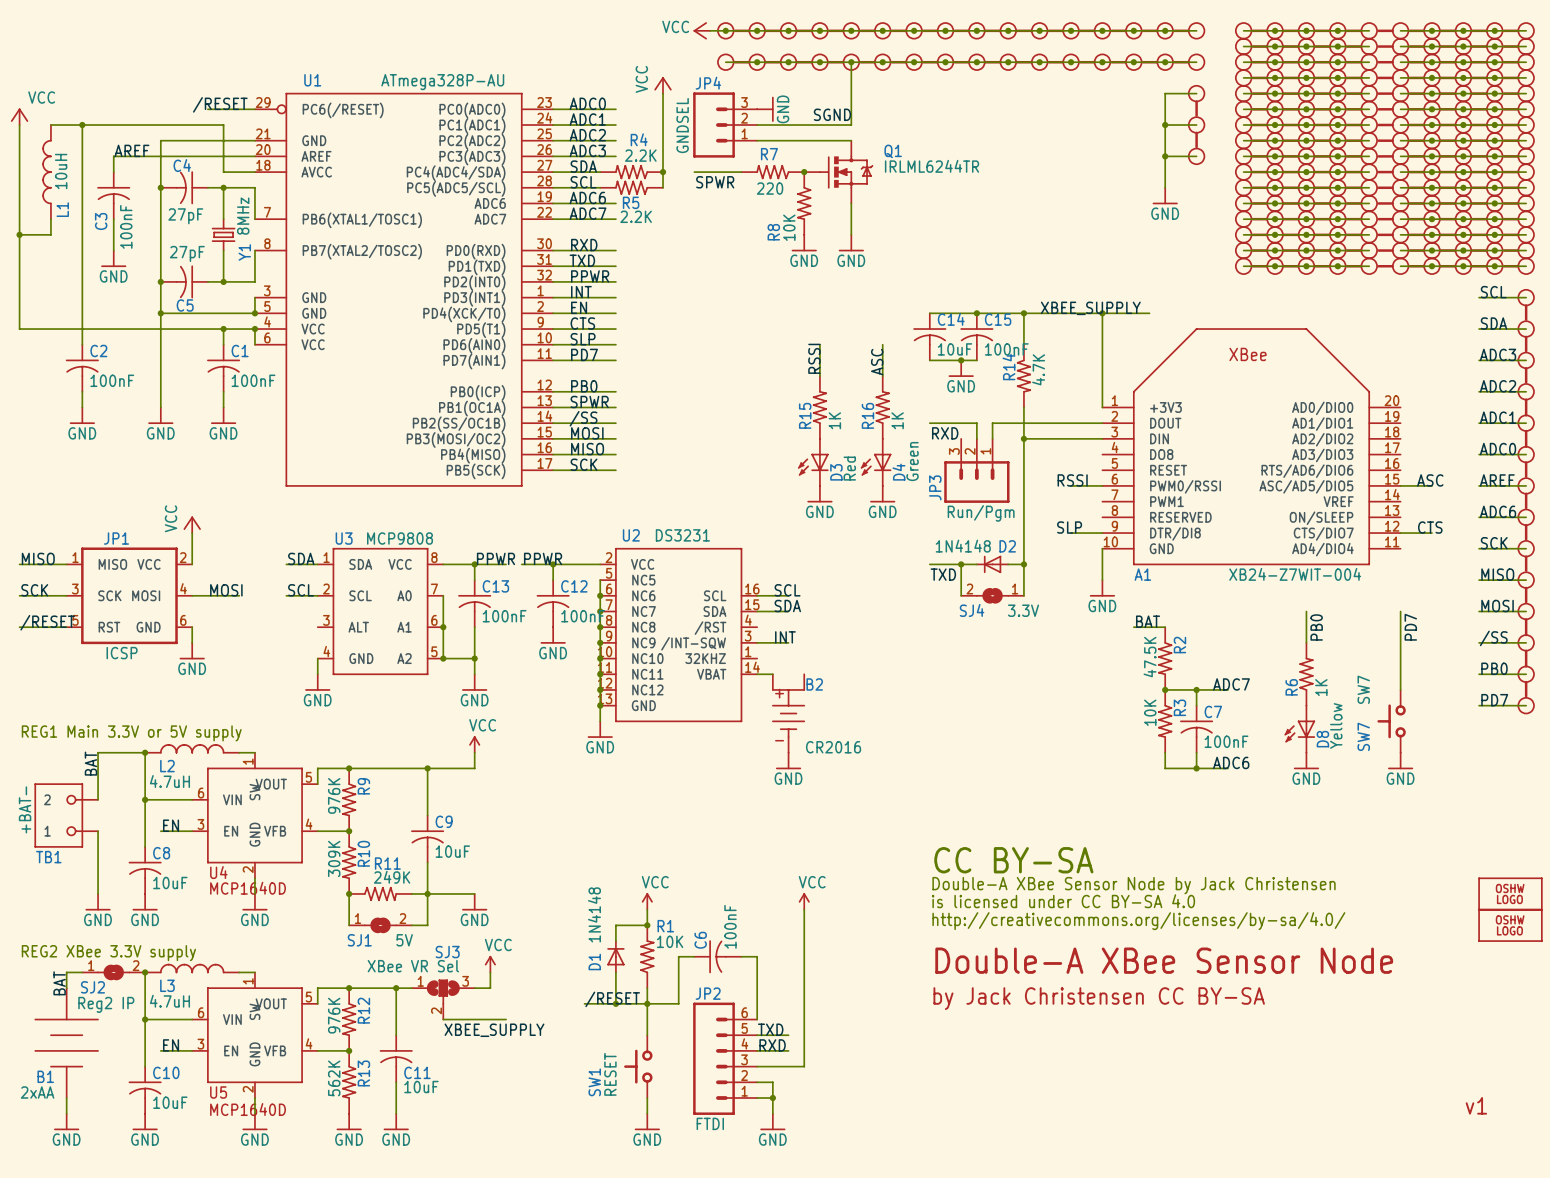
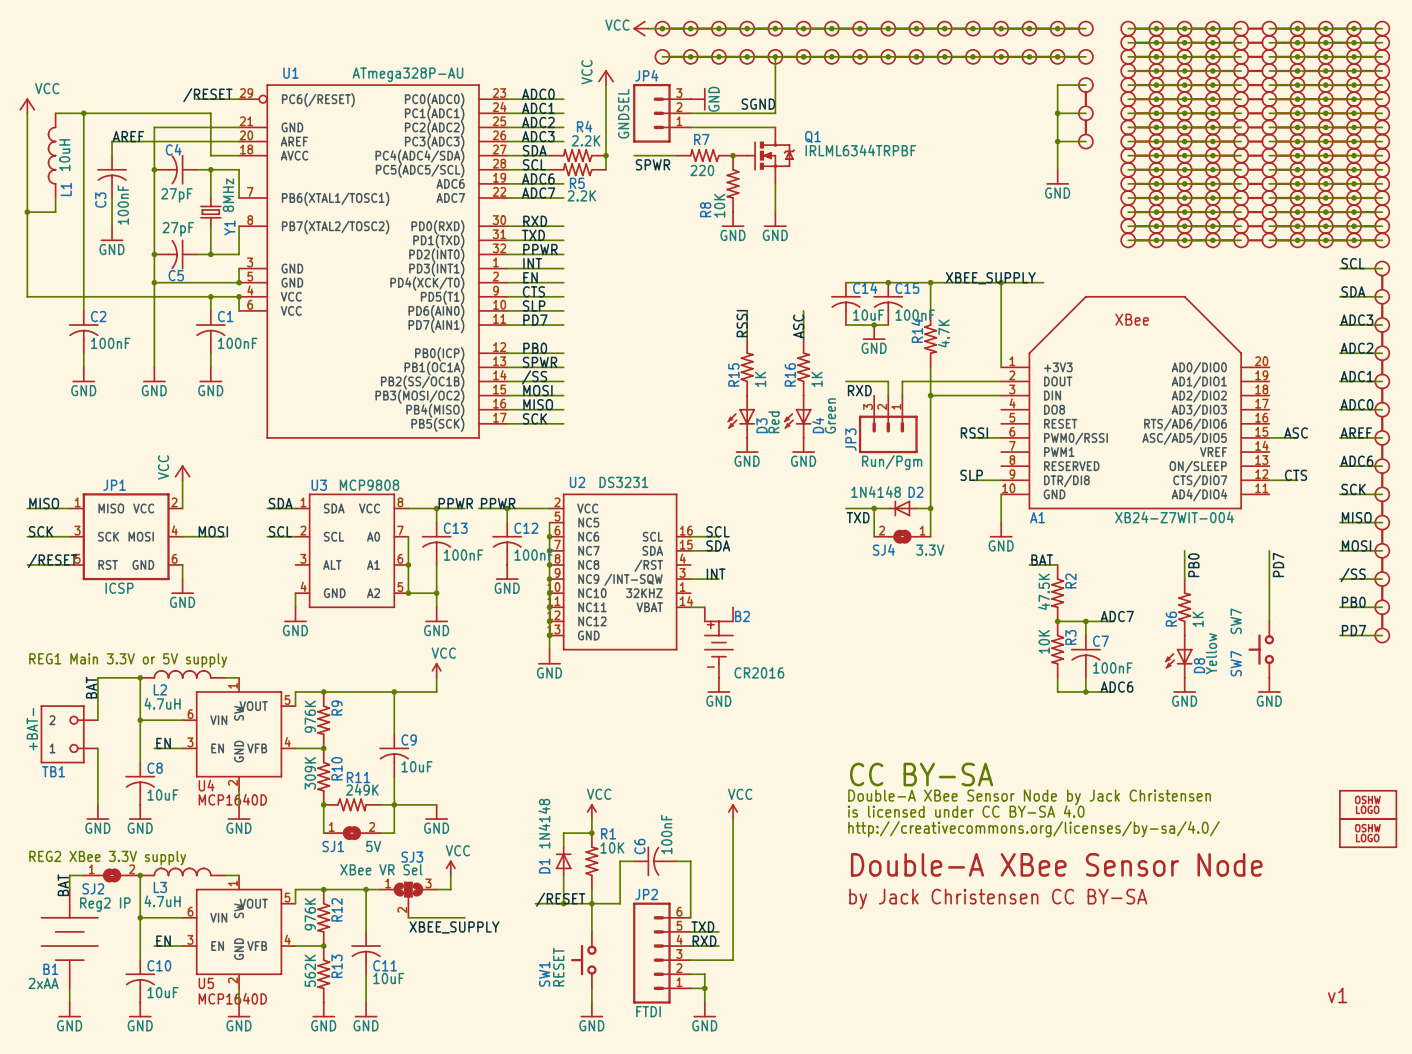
Q1 value: IRLML6244TR (932, 166) -> IRLML6344TRPBF (860, 150)

